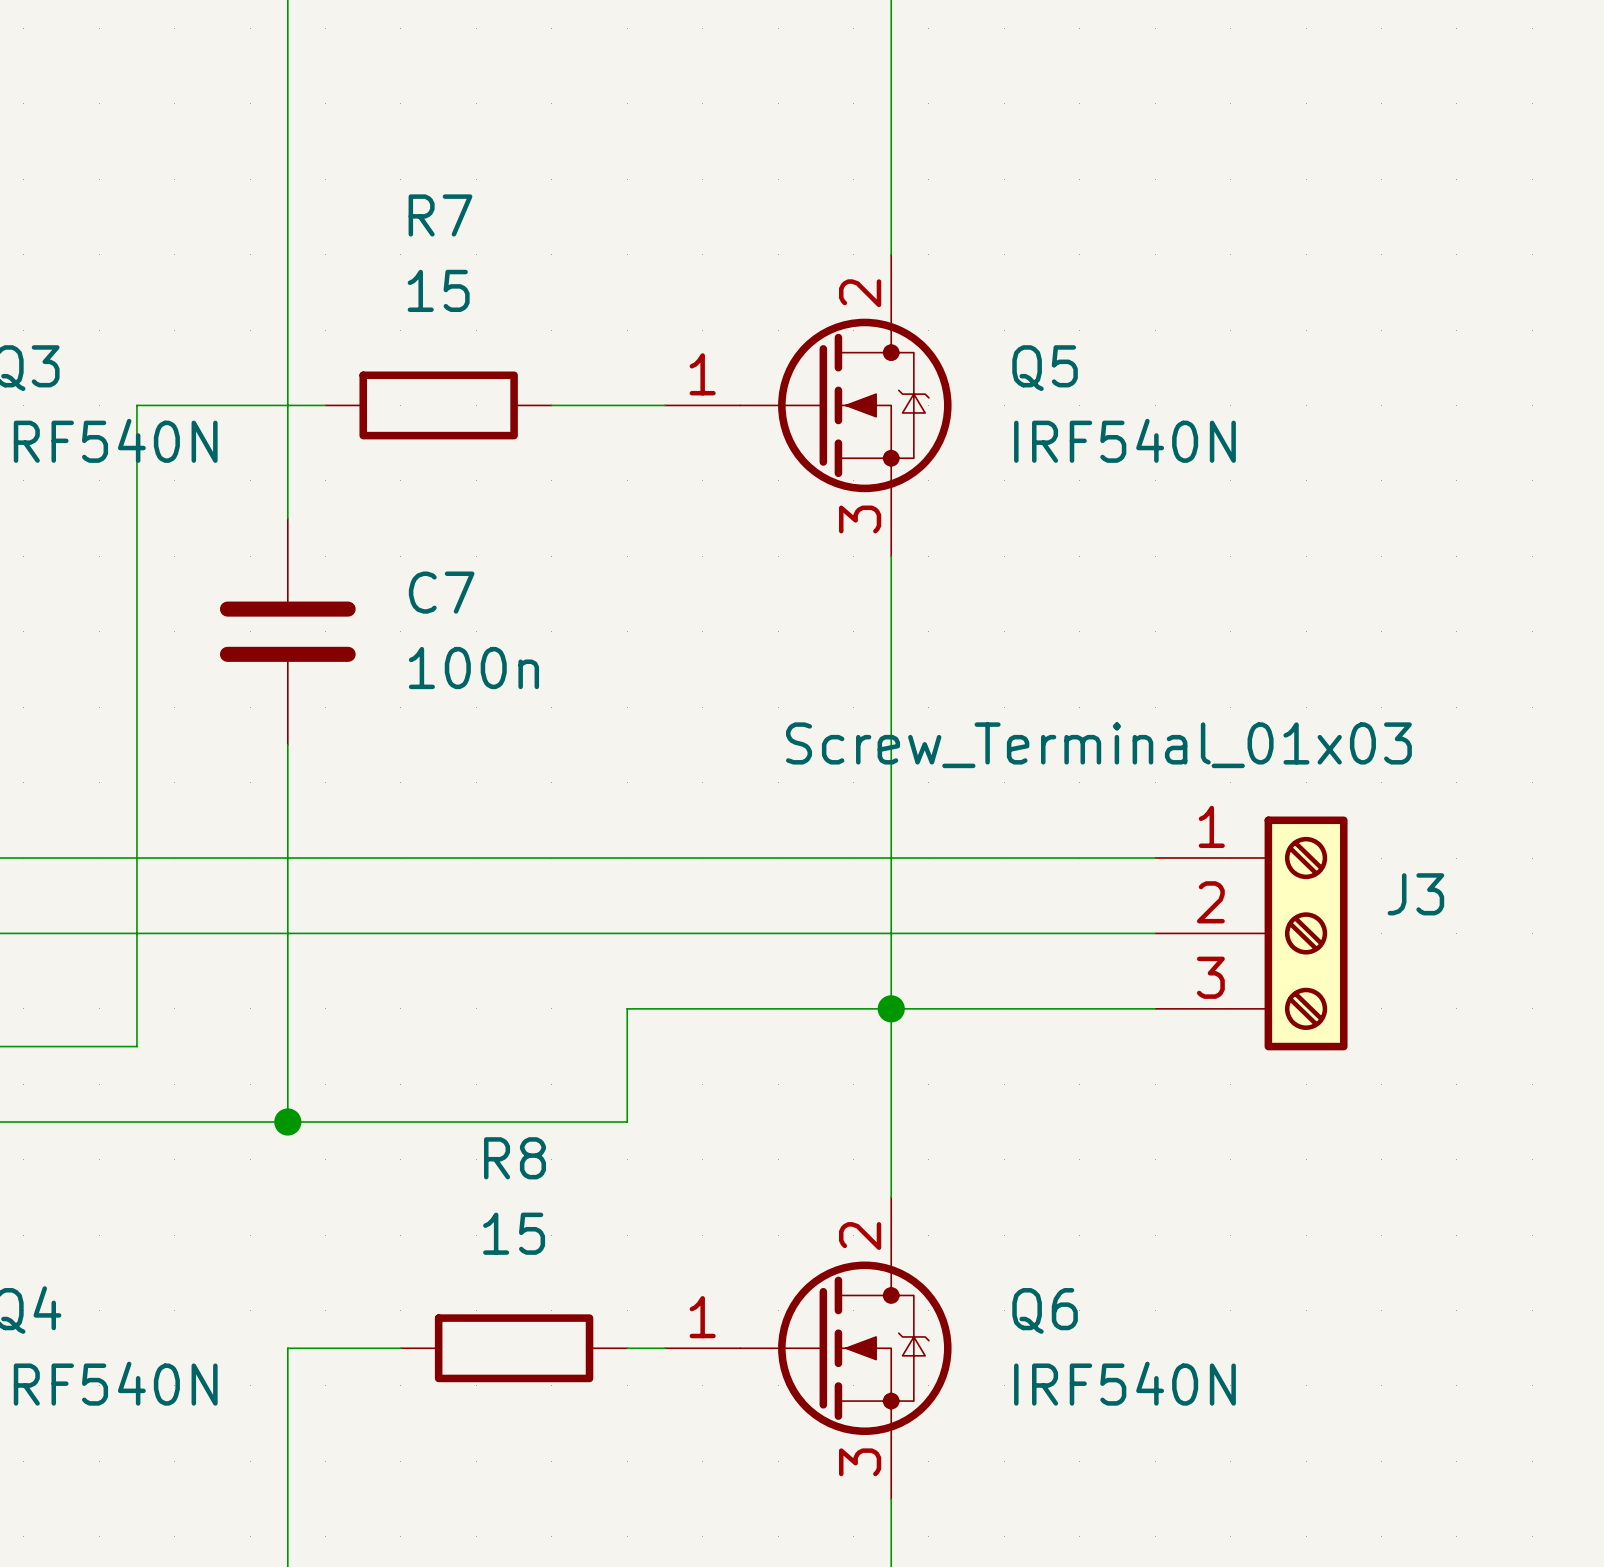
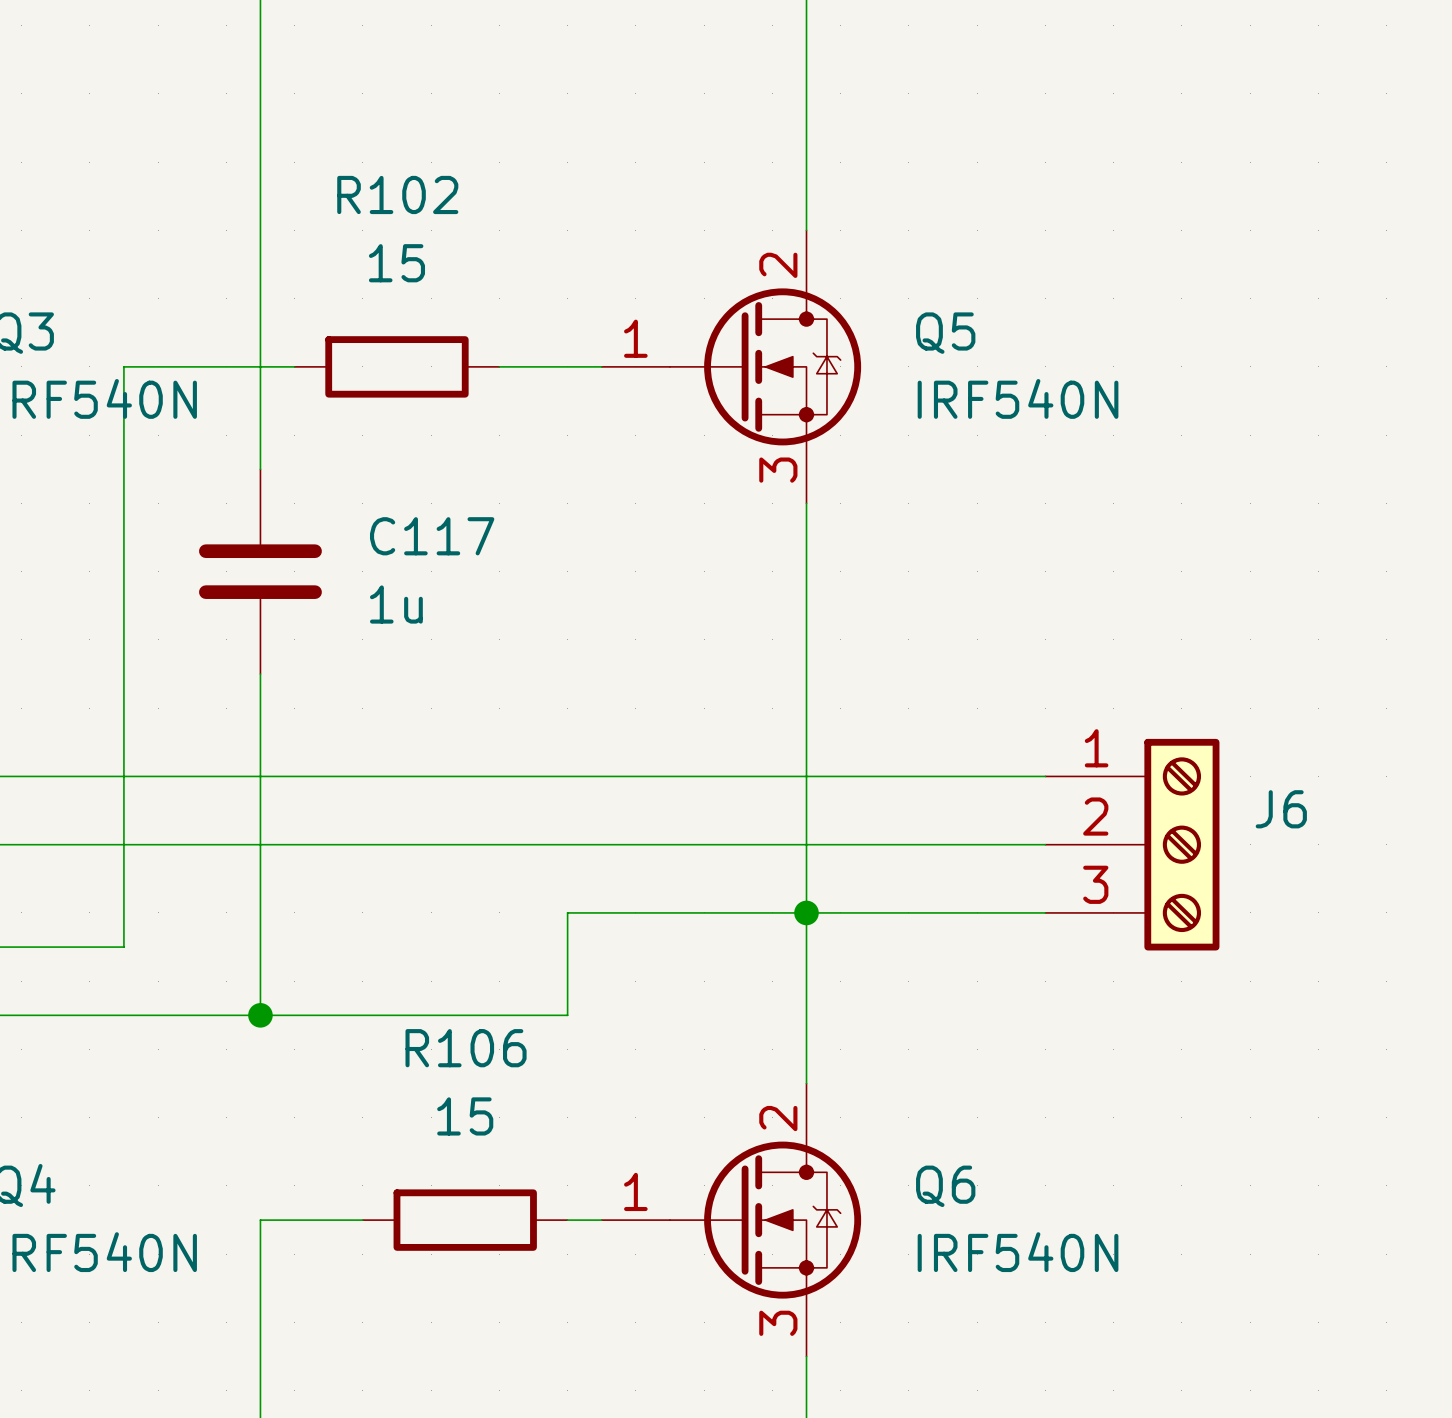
R7 name: R7 (440, 215) -> R102 (397, 194)
C7 name: C7 (441, 592) -> C117 (432, 536)
C7 value: 100n (473, 668) -> 1u (396, 604)
J3 value: Screw_Terminal_01x03 (1098, 745) -> none
J3 name: J3 (1415, 894) -> J6 (1281, 809)
R8 name: R8 (514, 1158) -> R106 (466, 1048)

